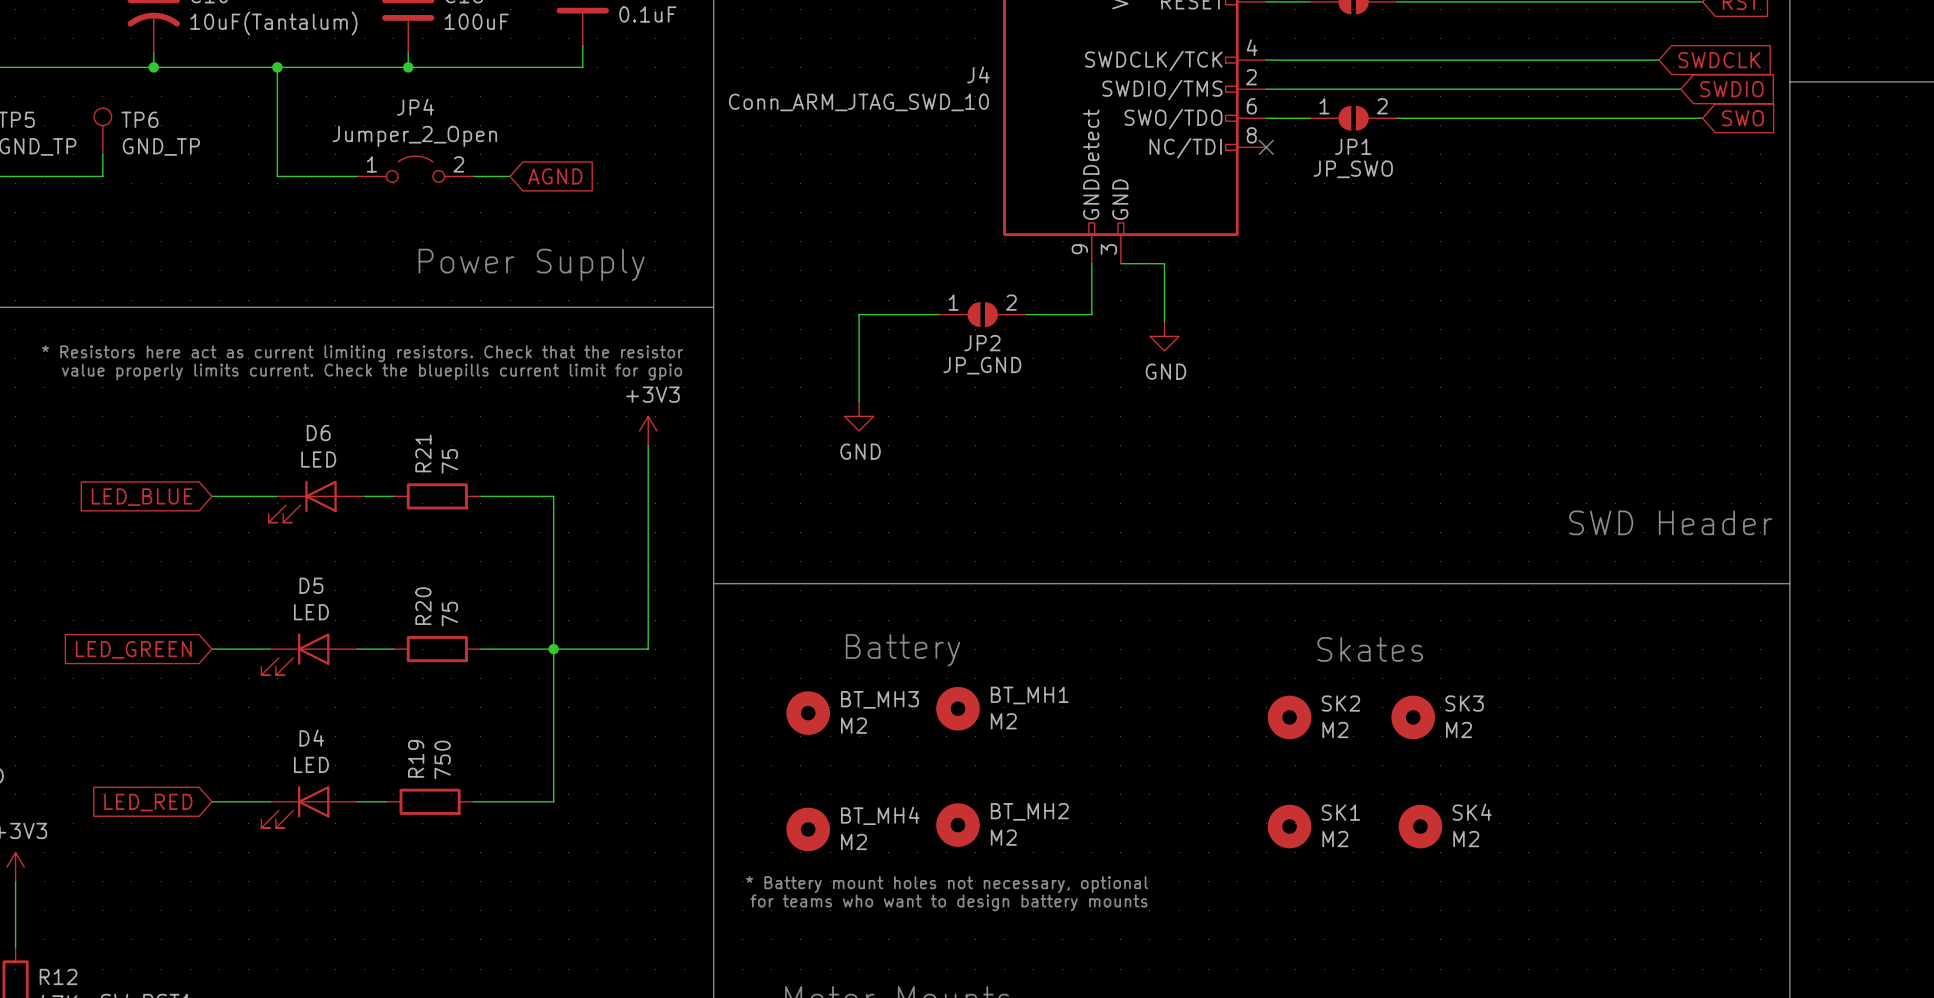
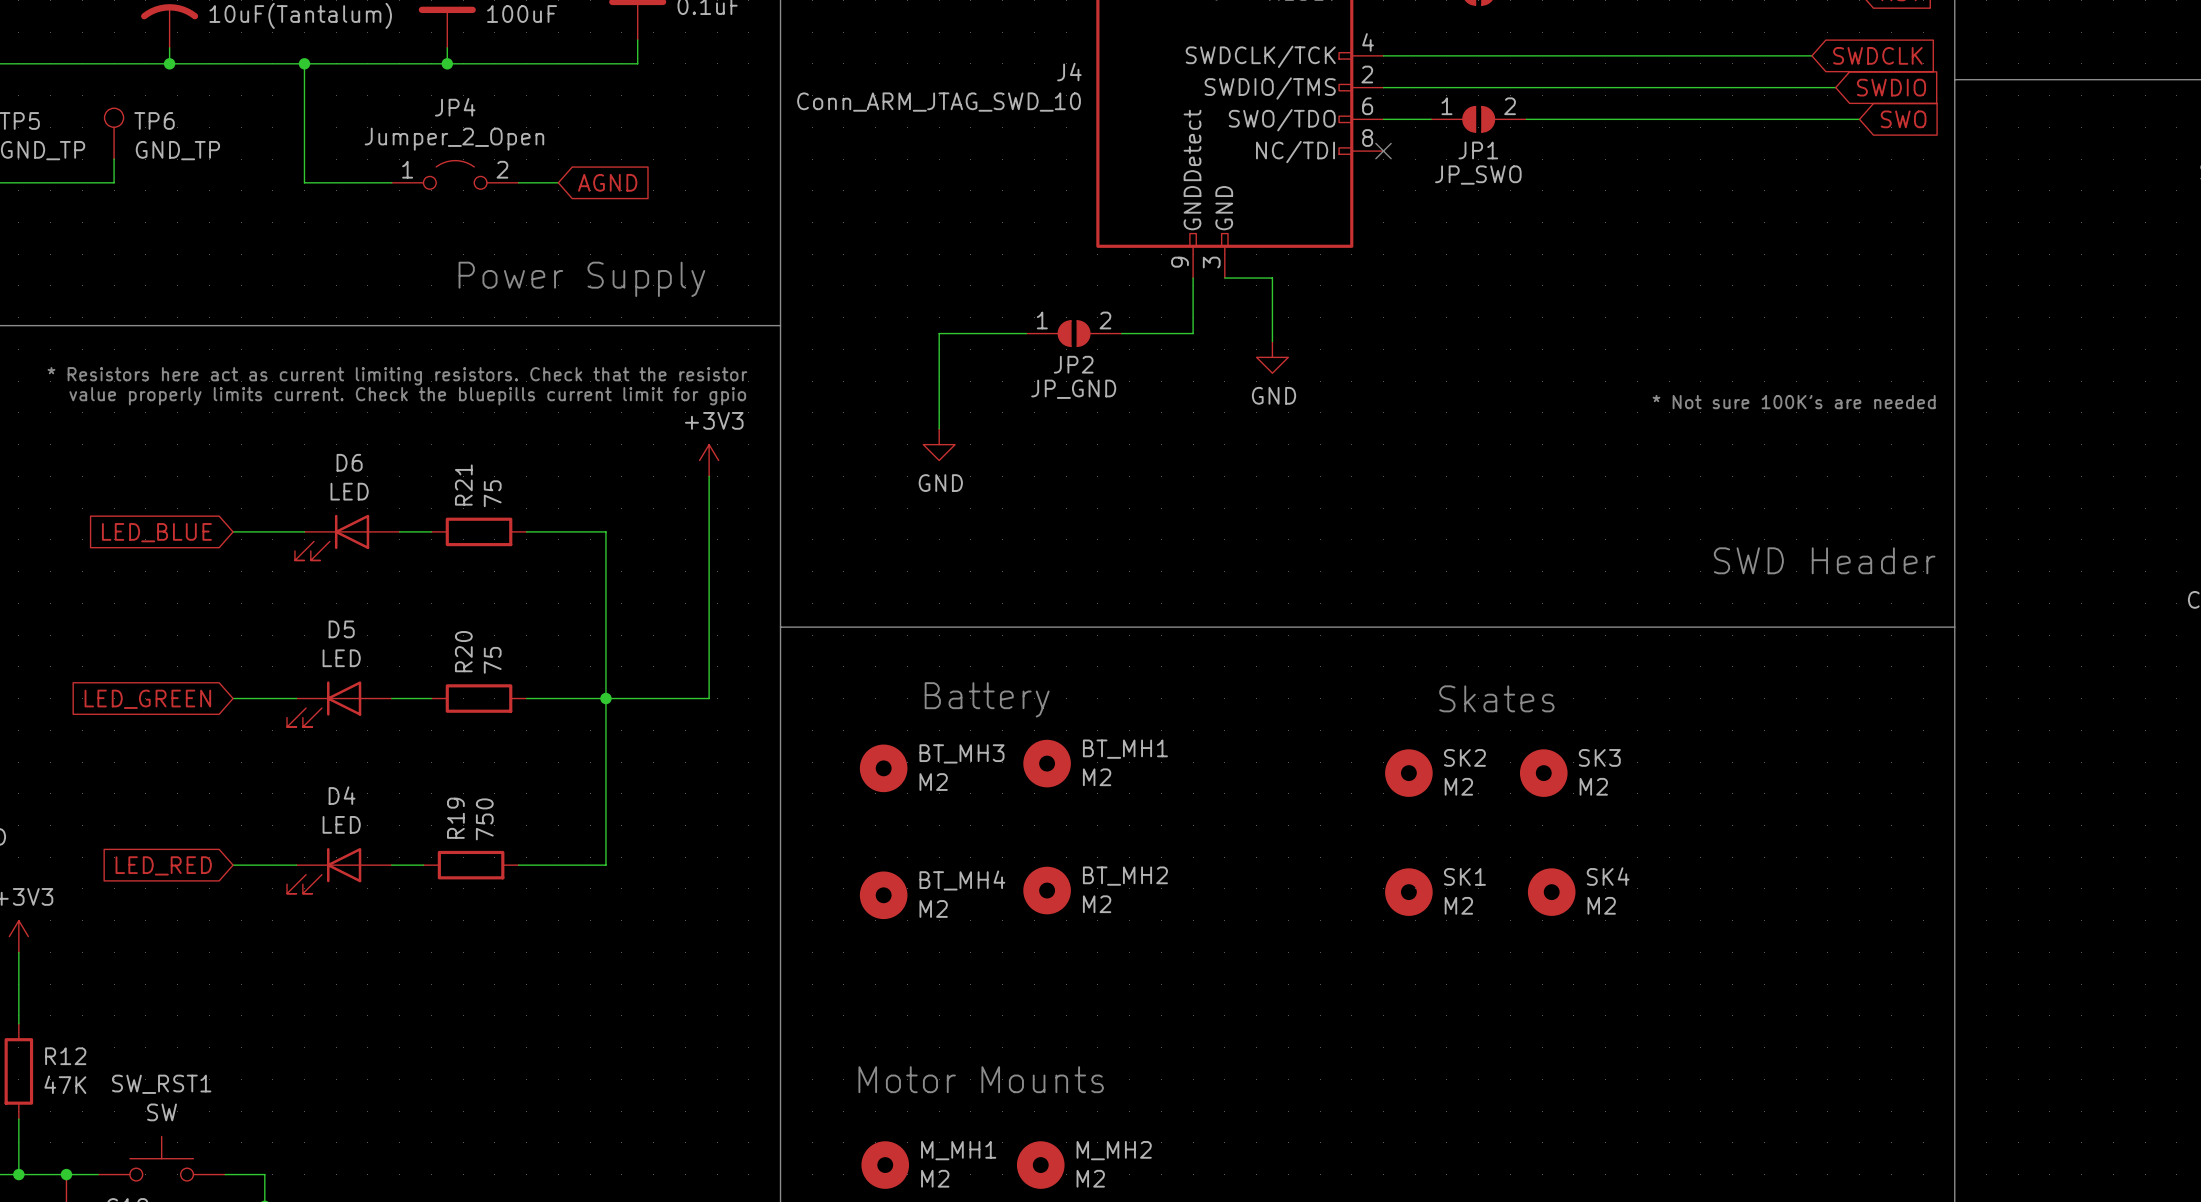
text: none -> * Not sure 100K’s are needed (1794, 402)
text: * Battery mount holes not necessary, optional (947, 884) -> none
text: for teams who want to design battery mounts (948, 902) -> none

